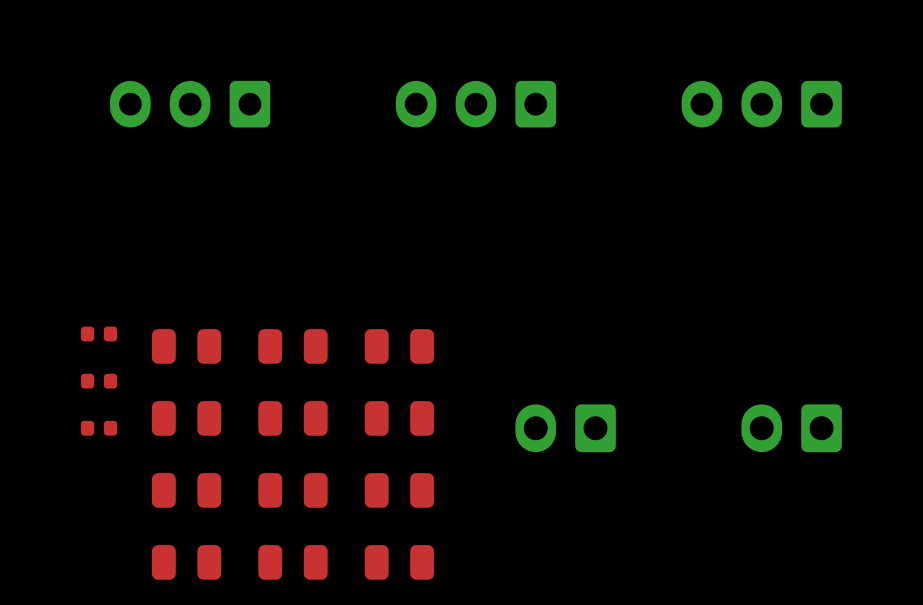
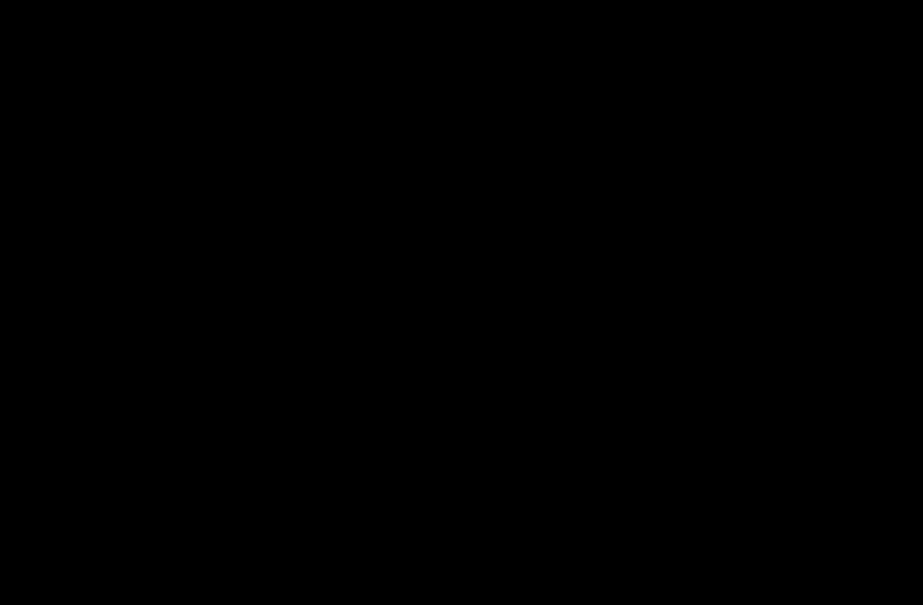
part: (190, 104) -> none
part: (475, 104) -> none
part: (761, 104) -> none
part: (99, 334) -> none
part: (186, 346) -> none
part: (292, 346) -> none
part: (399, 346) -> none
part: (99, 381) -> none
part: (186, 418) -> none
part: (292, 418) -> none
part: (399, 418) -> none
part: (99, 428) -> none
part: (565, 428) -> none
part: (791, 428) -> none
part: (186, 490) -> none
part: (292, 490) -> none
part: (399, 490) -> none
part: (186, 562) -> none
part: (292, 562) -> none
part: (399, 562) -> none

